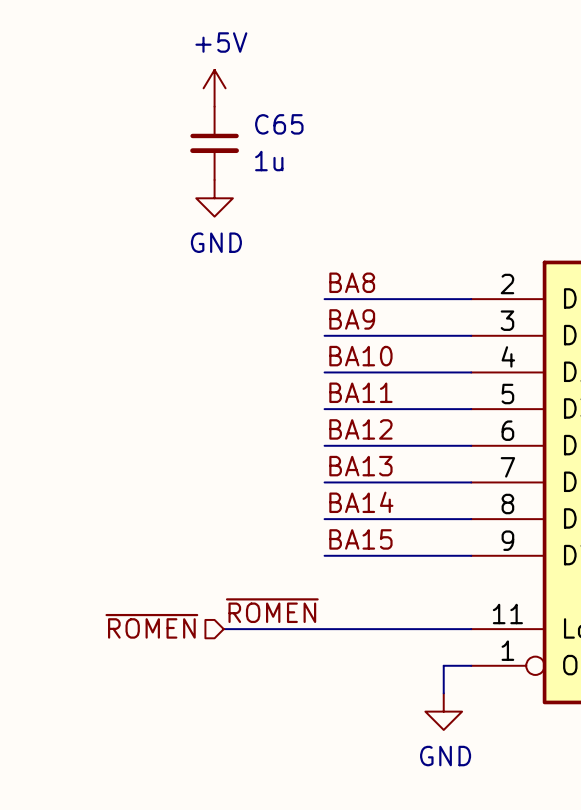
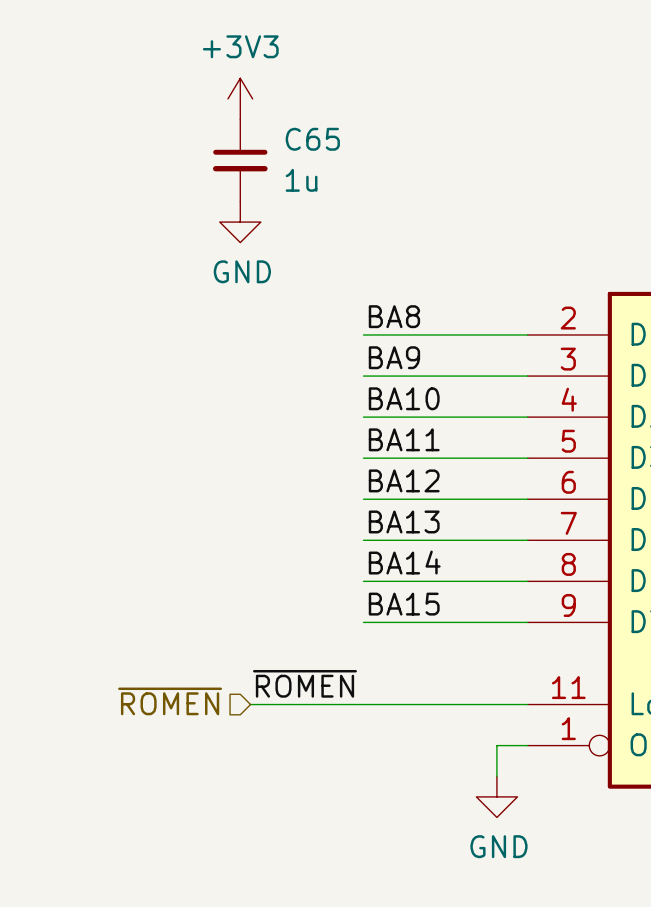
power symbol: +5V (214, 88) -> +3V3 (240, 98)

